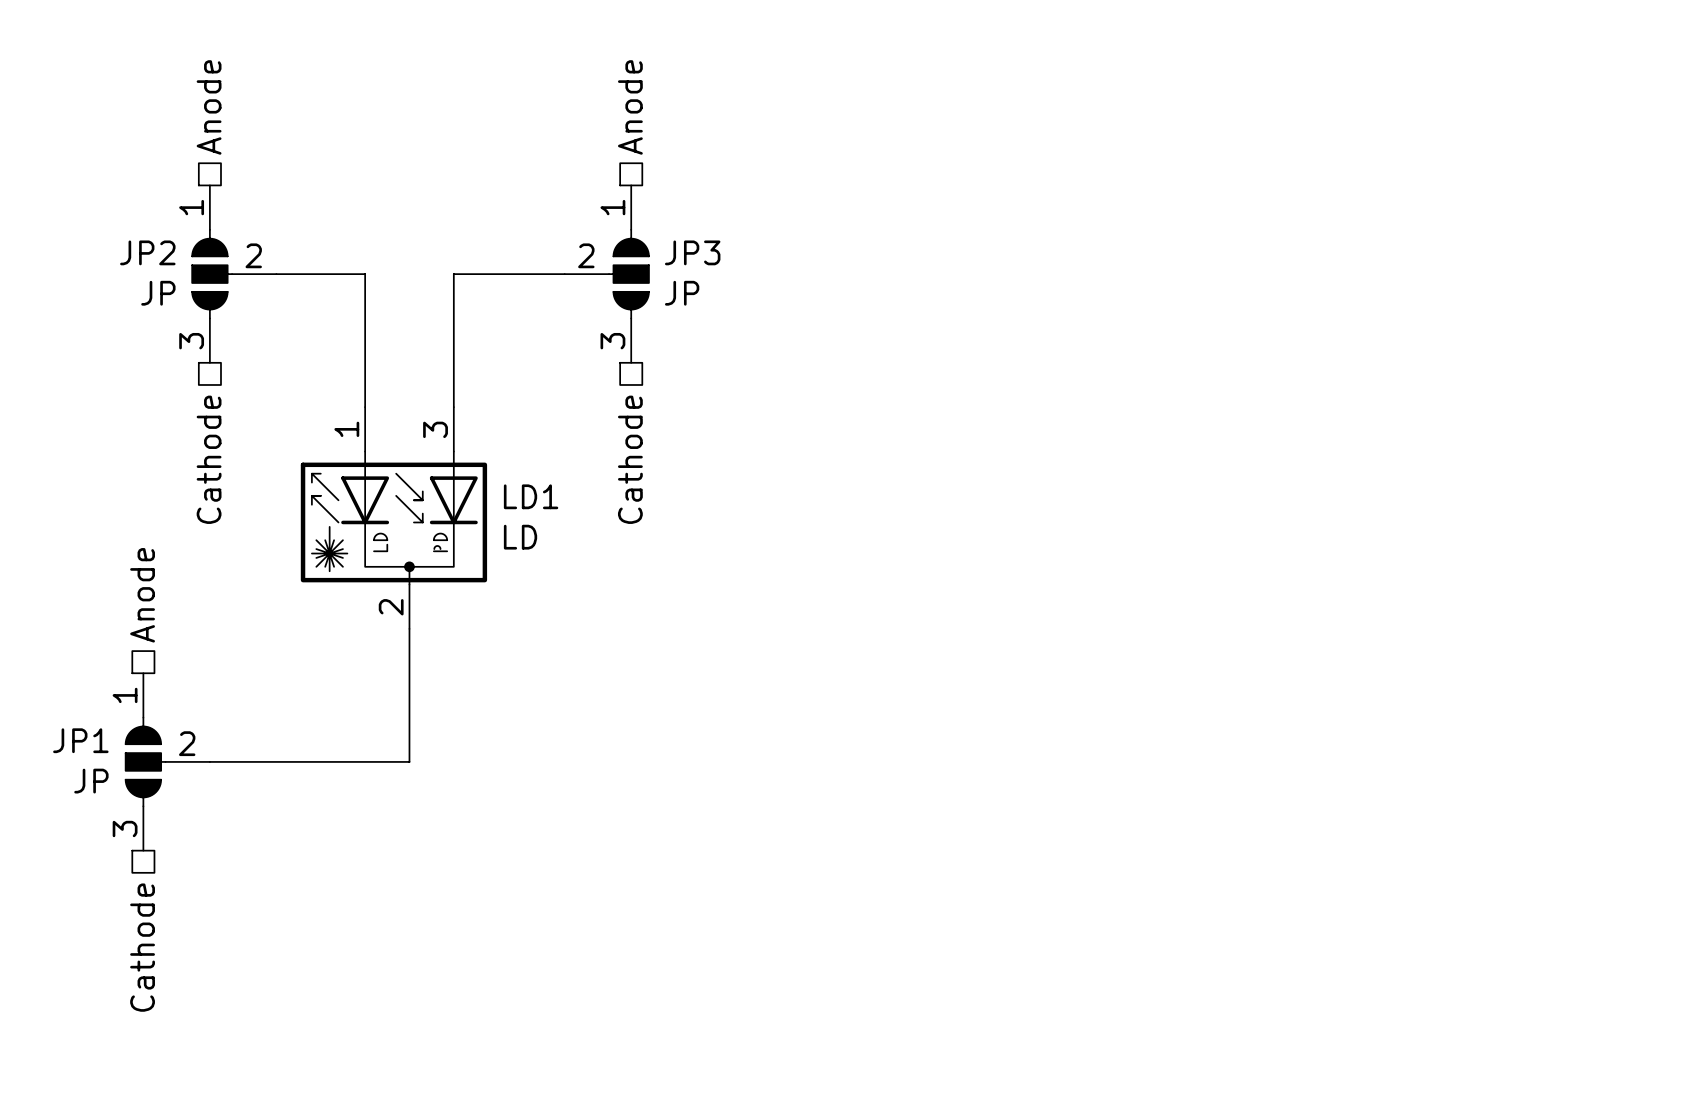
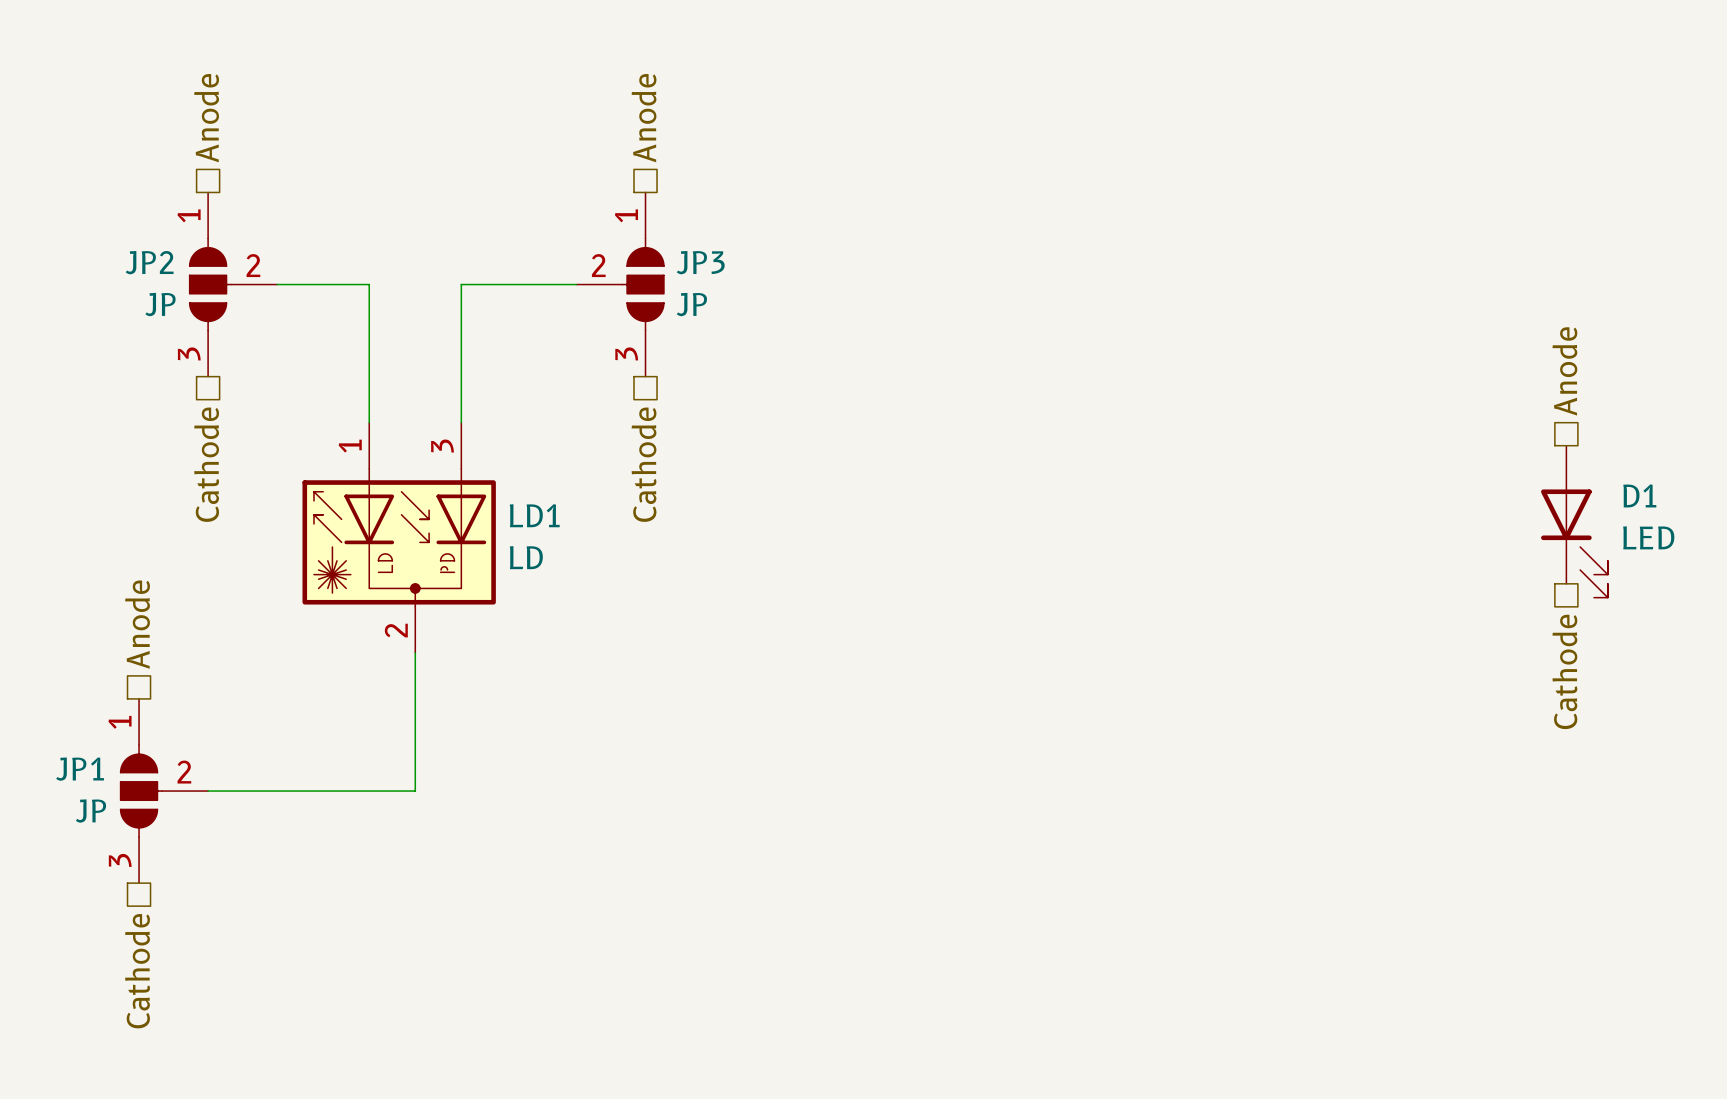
hierarchical label: none -> Anode (1564, 371)
D1: none -> LED (1574, 521)
hierarchical label: none -> Cathode (1564, 671)

